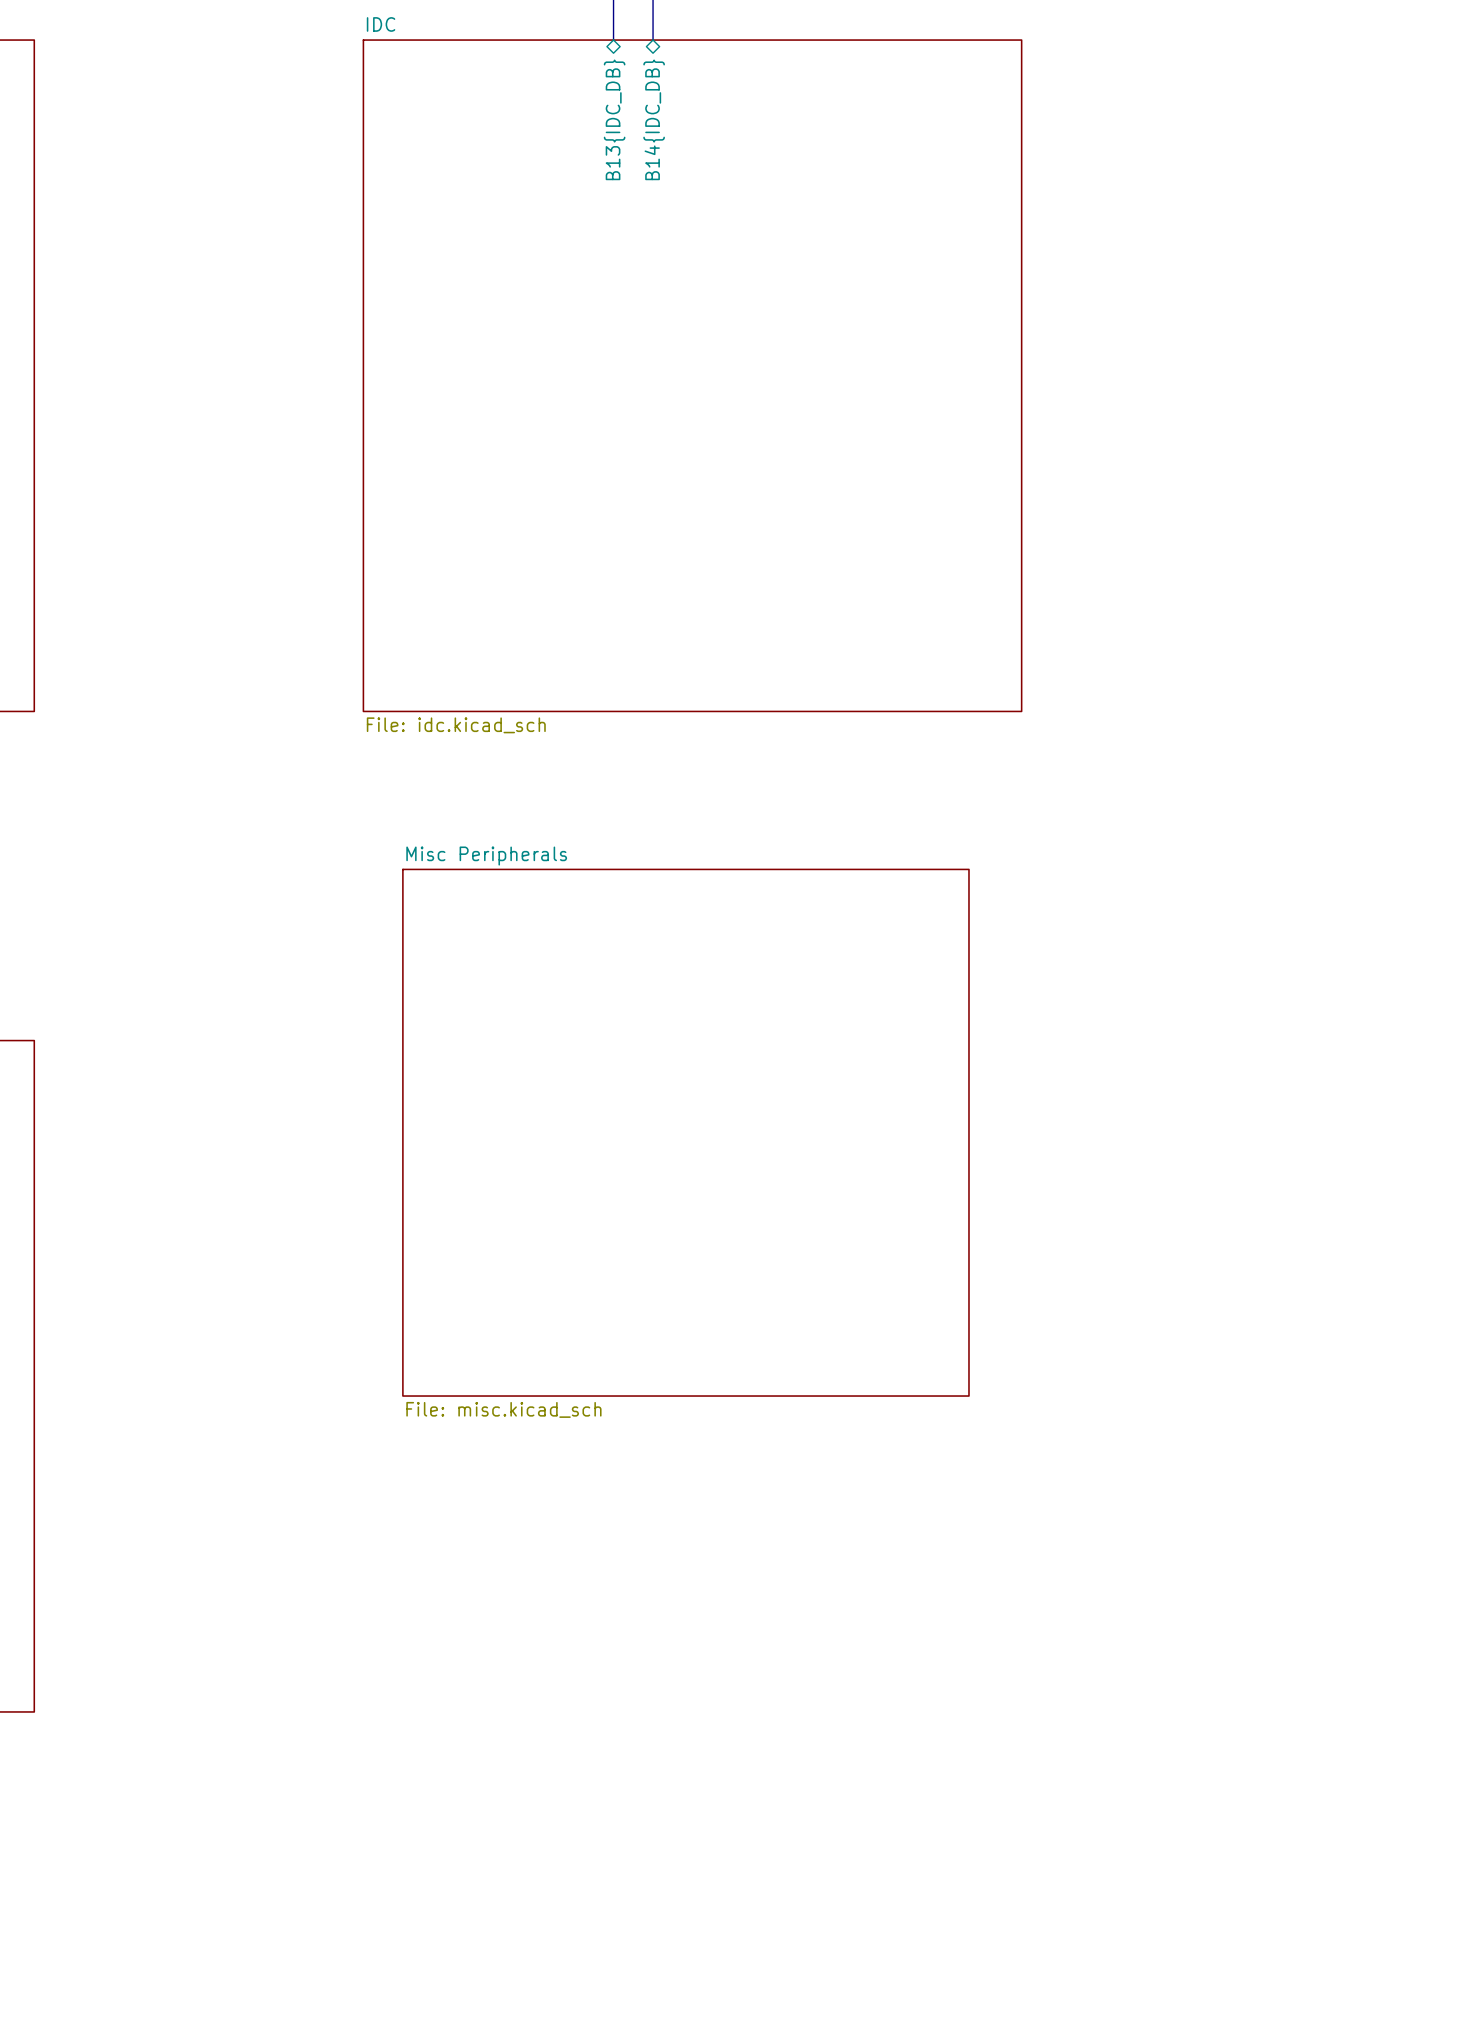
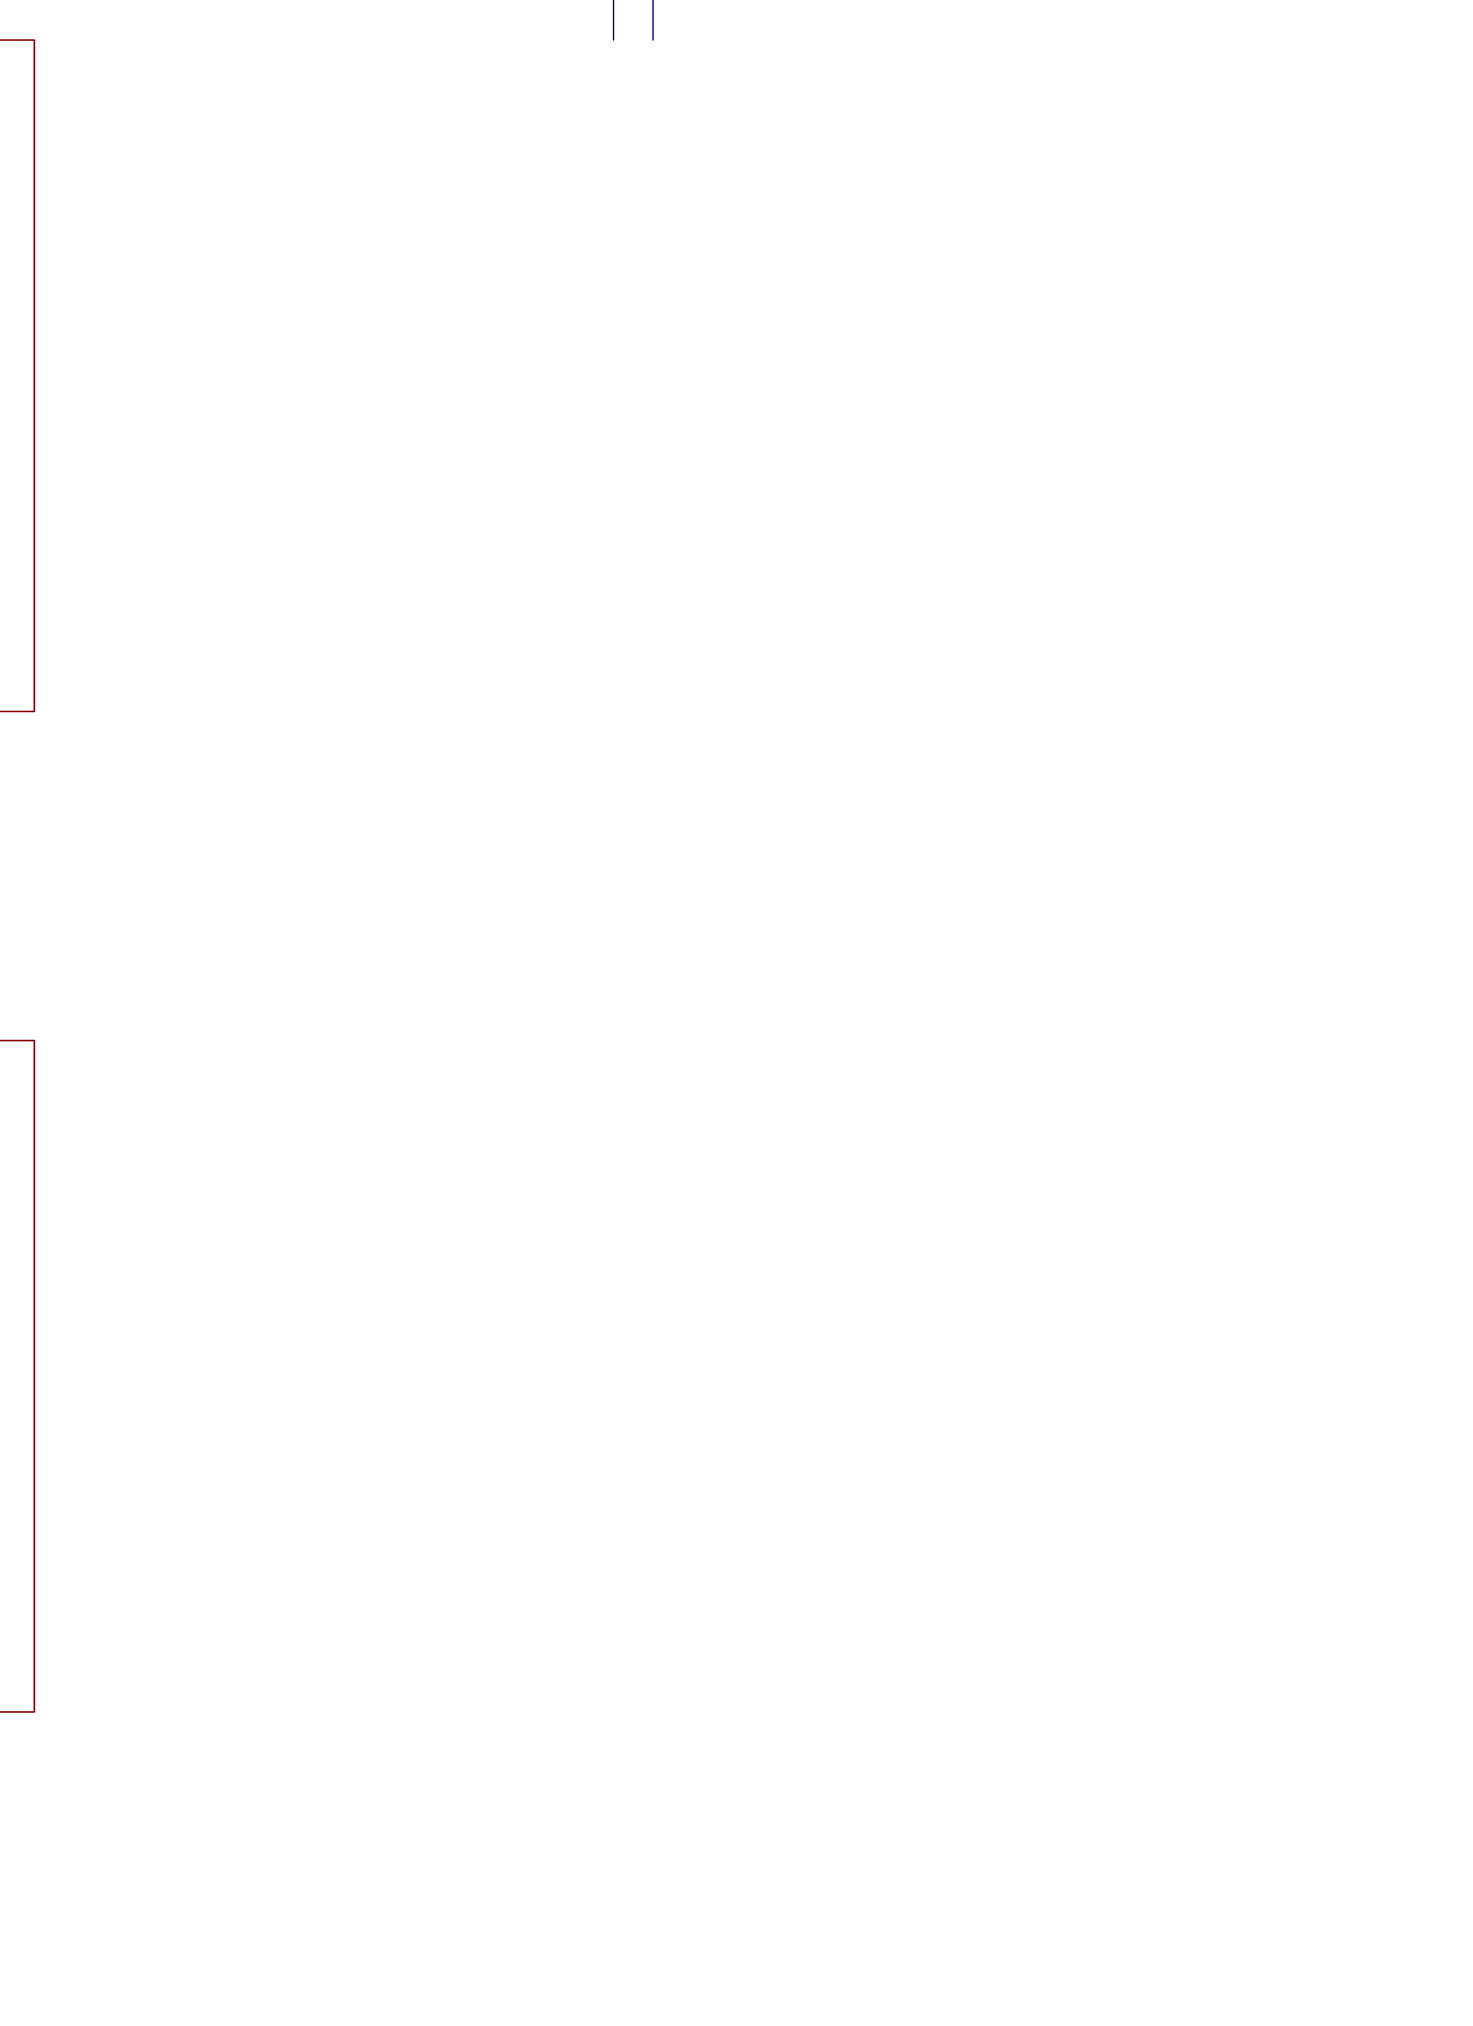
sheet pin: B13{IDC_DB} (614, 119) -> none
sheet pin: B14{IDC_DB} (654, 119) -> none
sheet IDC: File: idc.kicad_sch (692, 375) -> none
sheet Misc Peripherals: File: misc.kicad_sch (685, 1132) -> none

